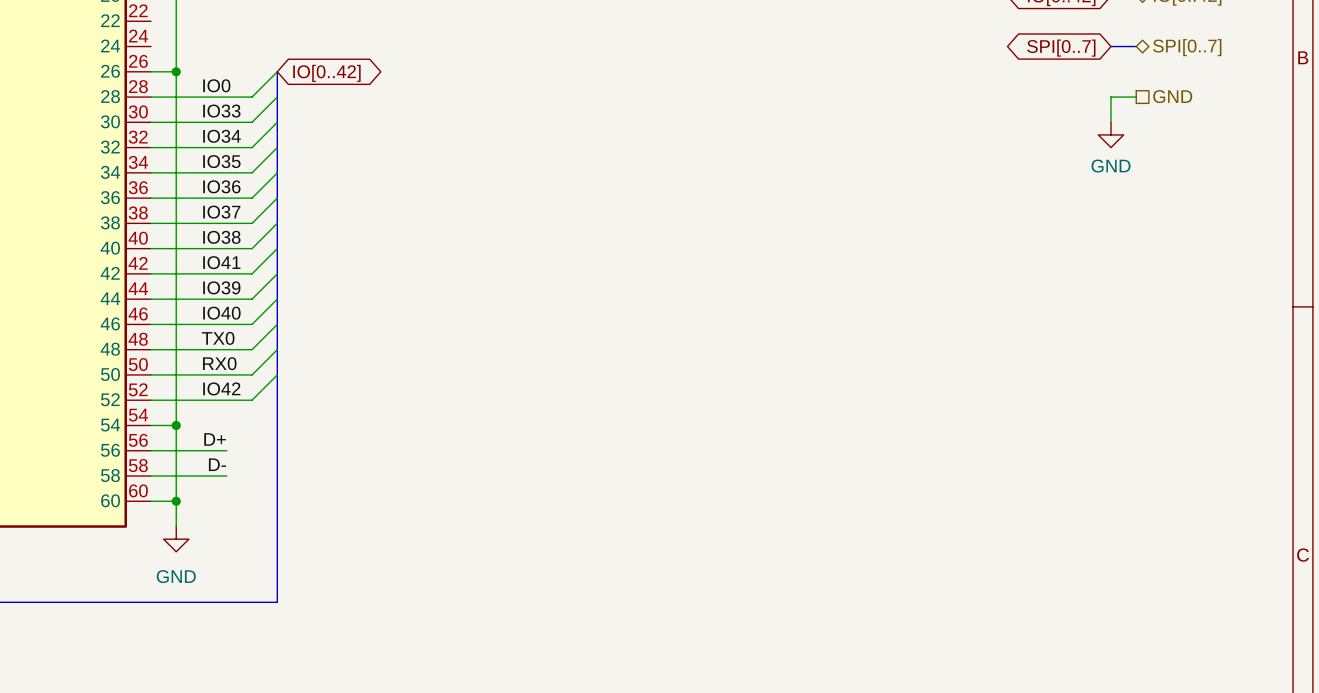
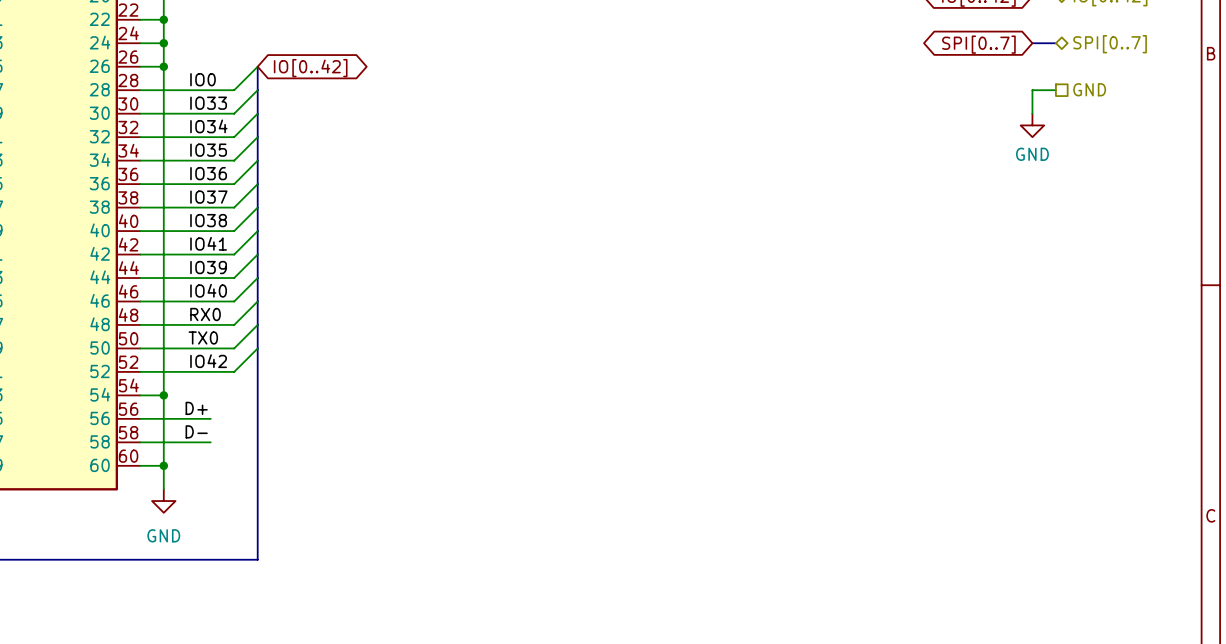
wire: none -> (140, 19) (163, 19)
junction: none -> (163, 19)
wire: none -> (140, 43) (163, 43)
junction: none -> (163, 43)
label: TX0 (218, 338) -> RX0 (205, 314)
label: RX0 (219, 363) -> TX0 (203, 337)

